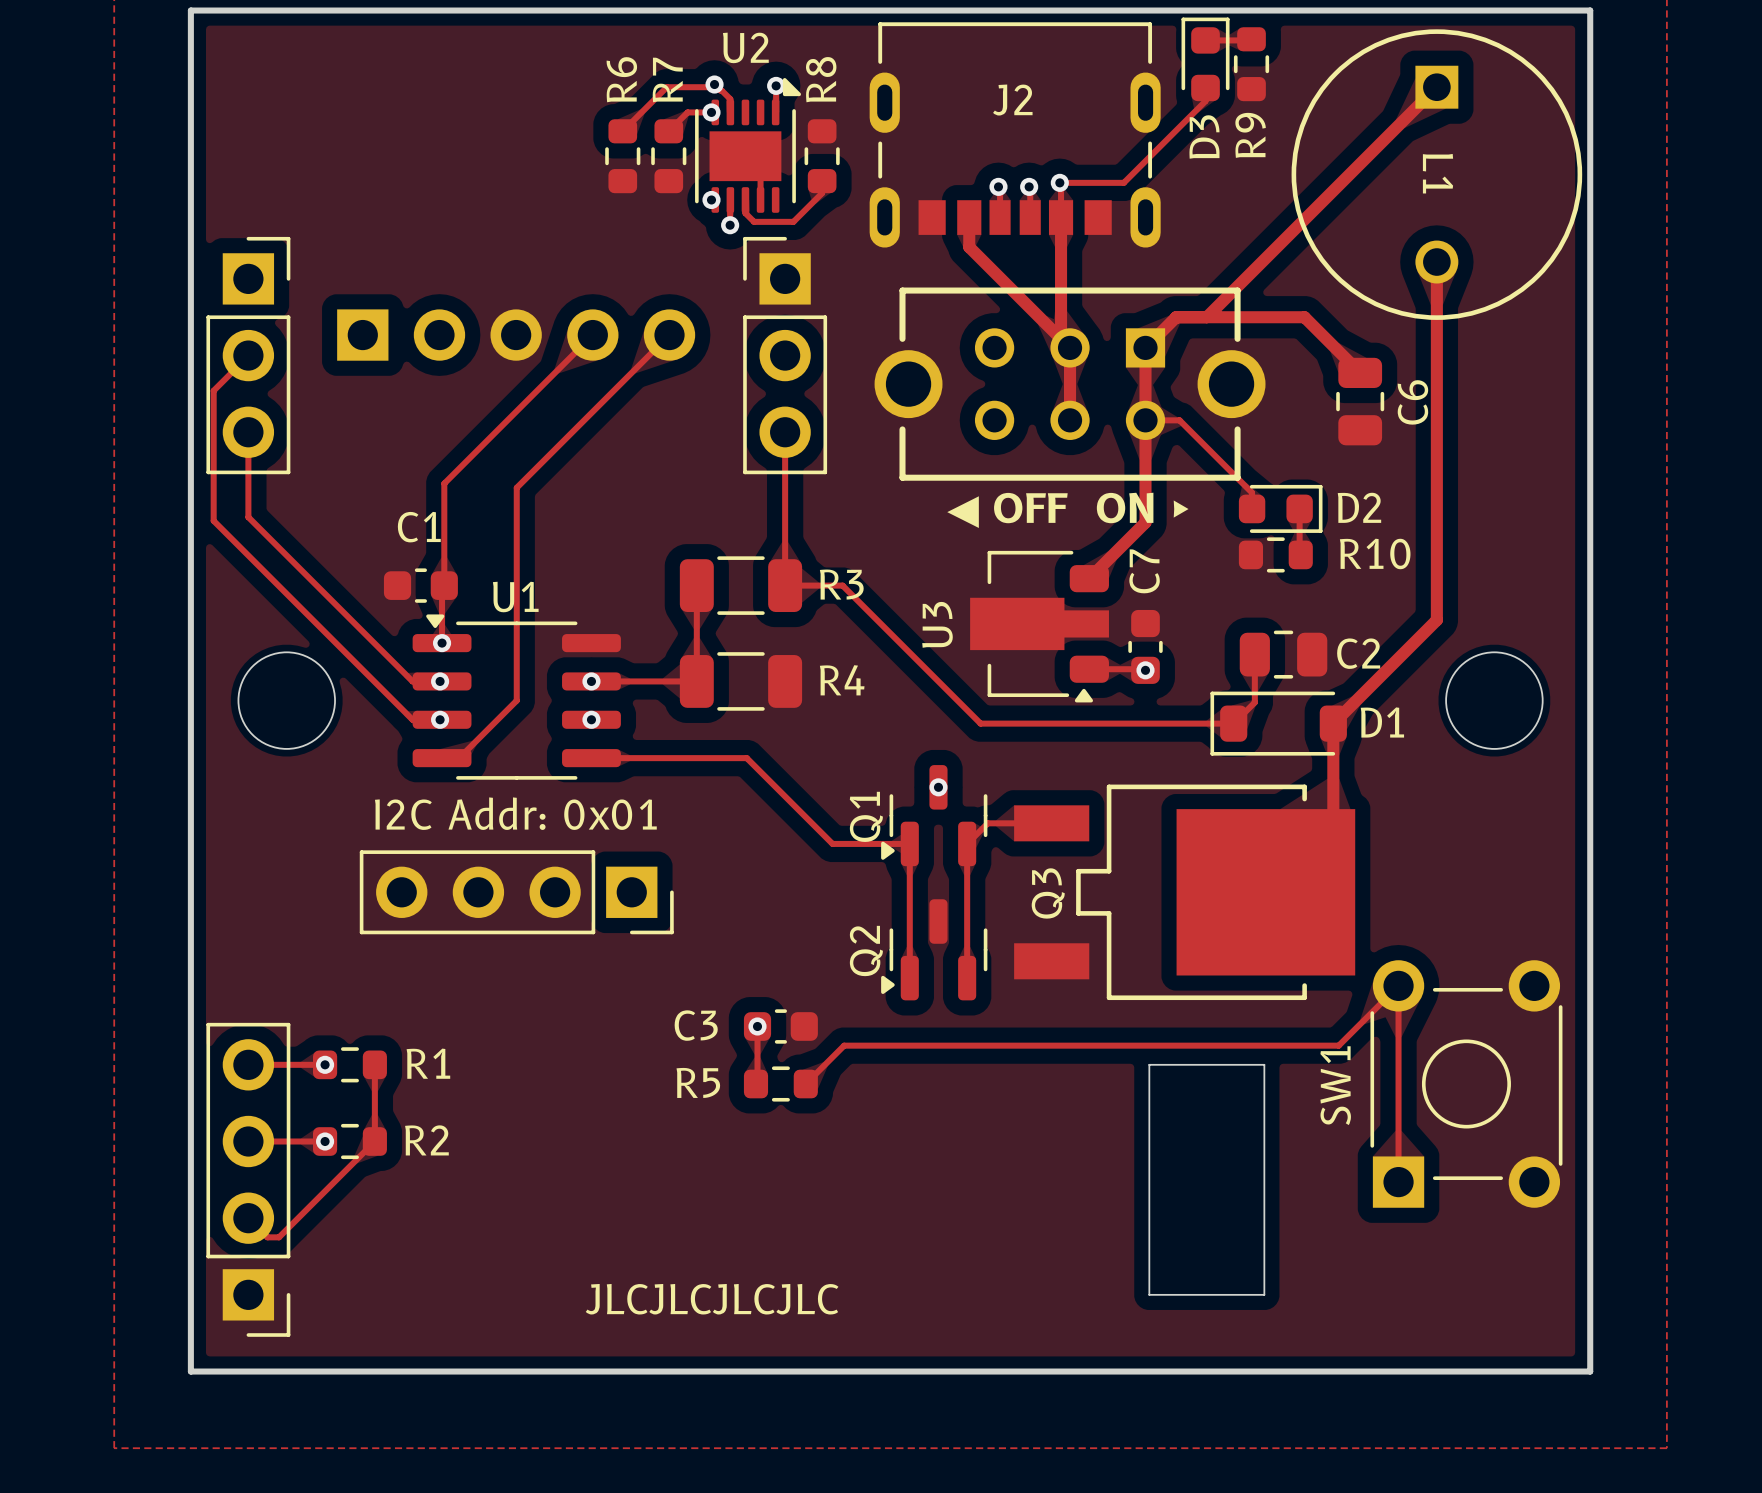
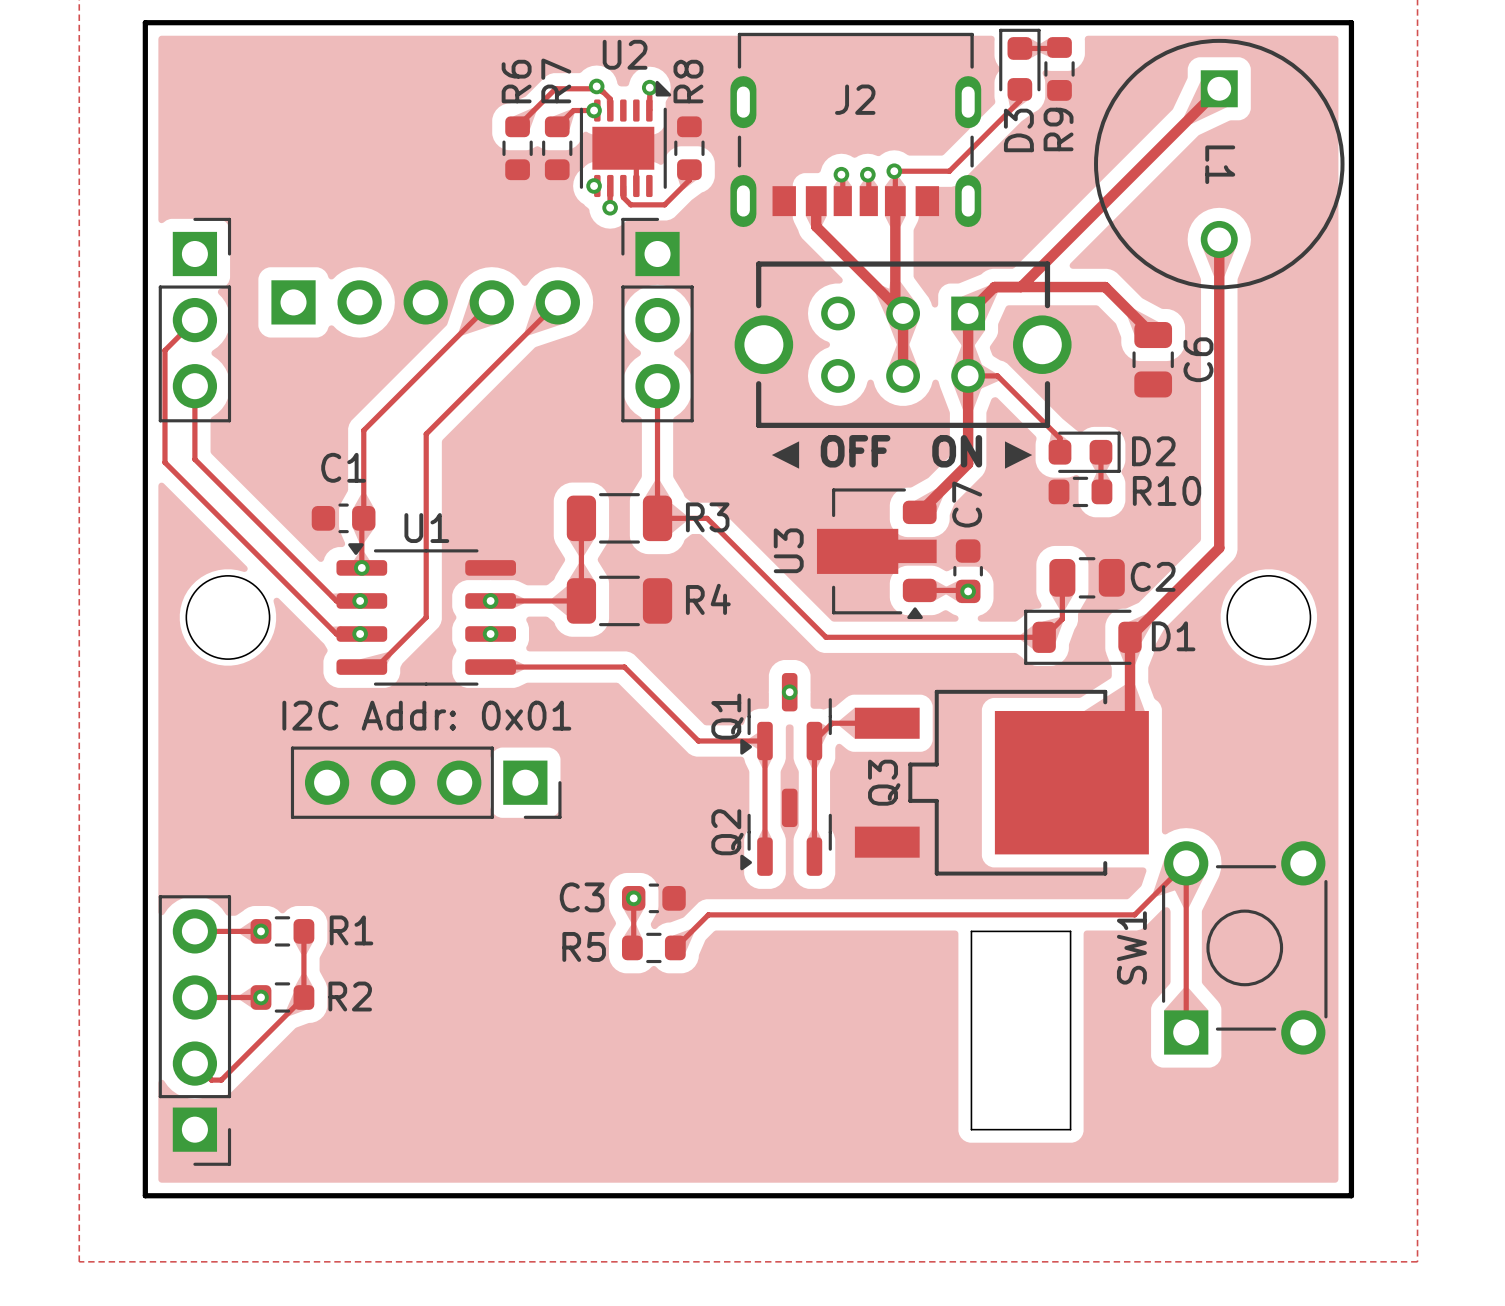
text: JLCJLCJLCJLC (712, 1299) -> none

